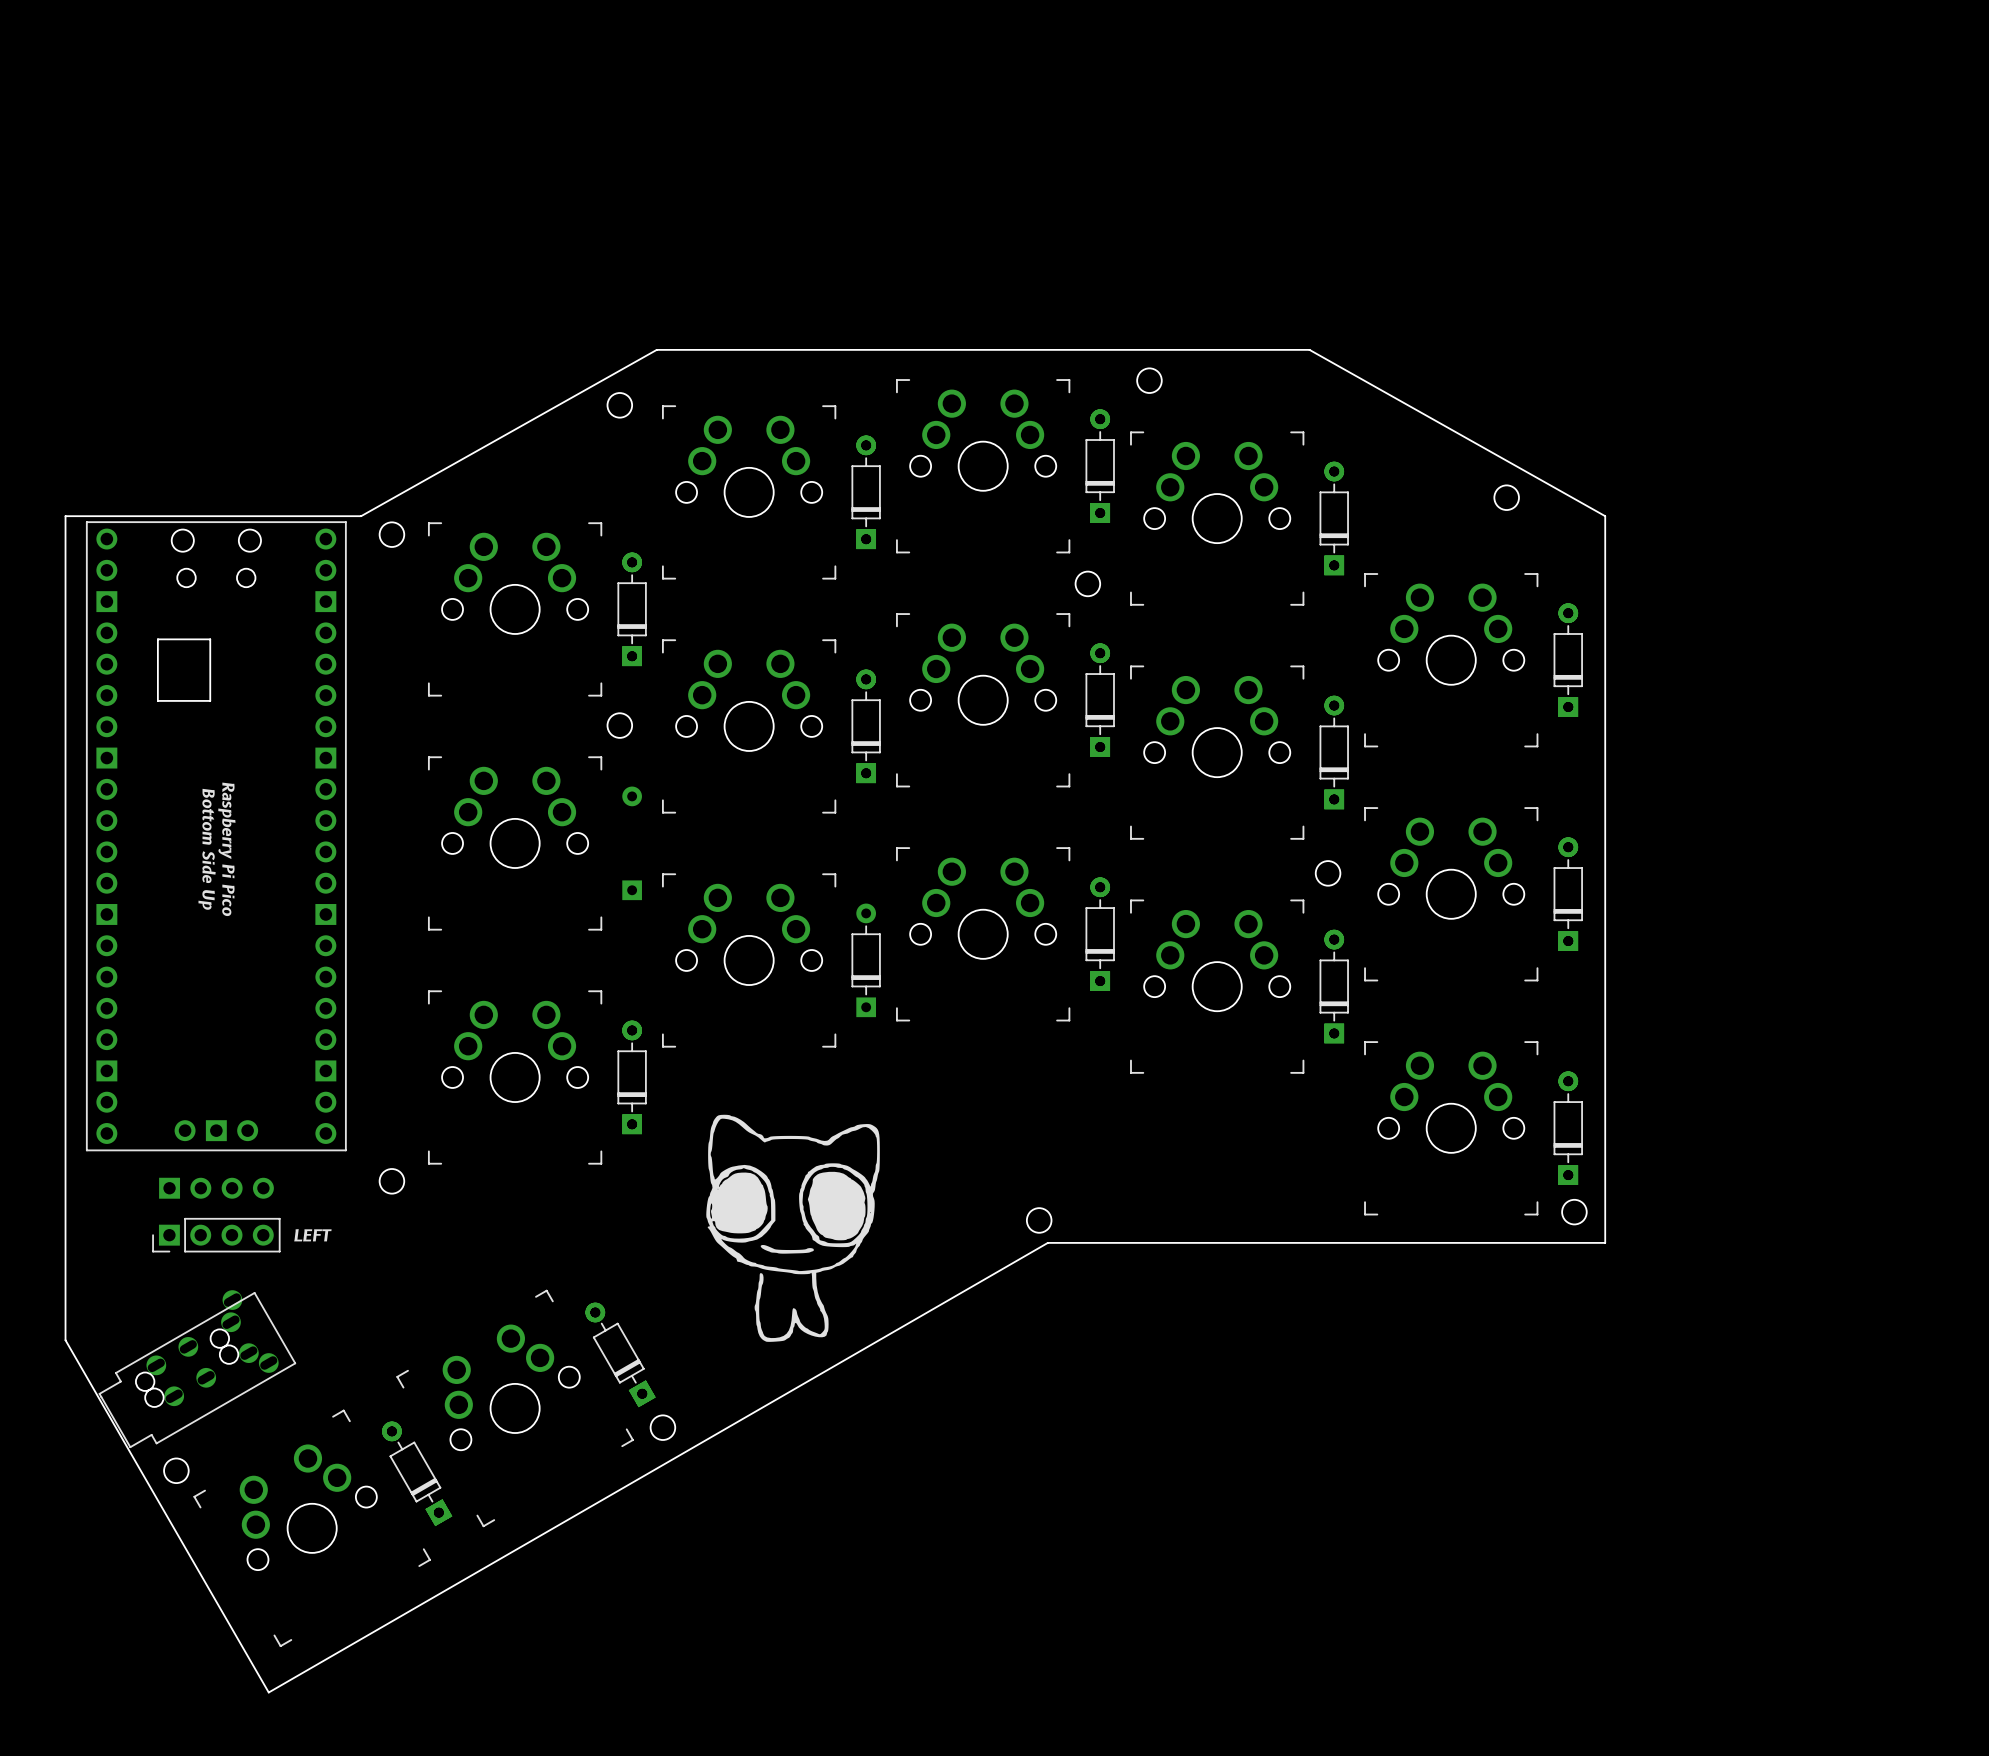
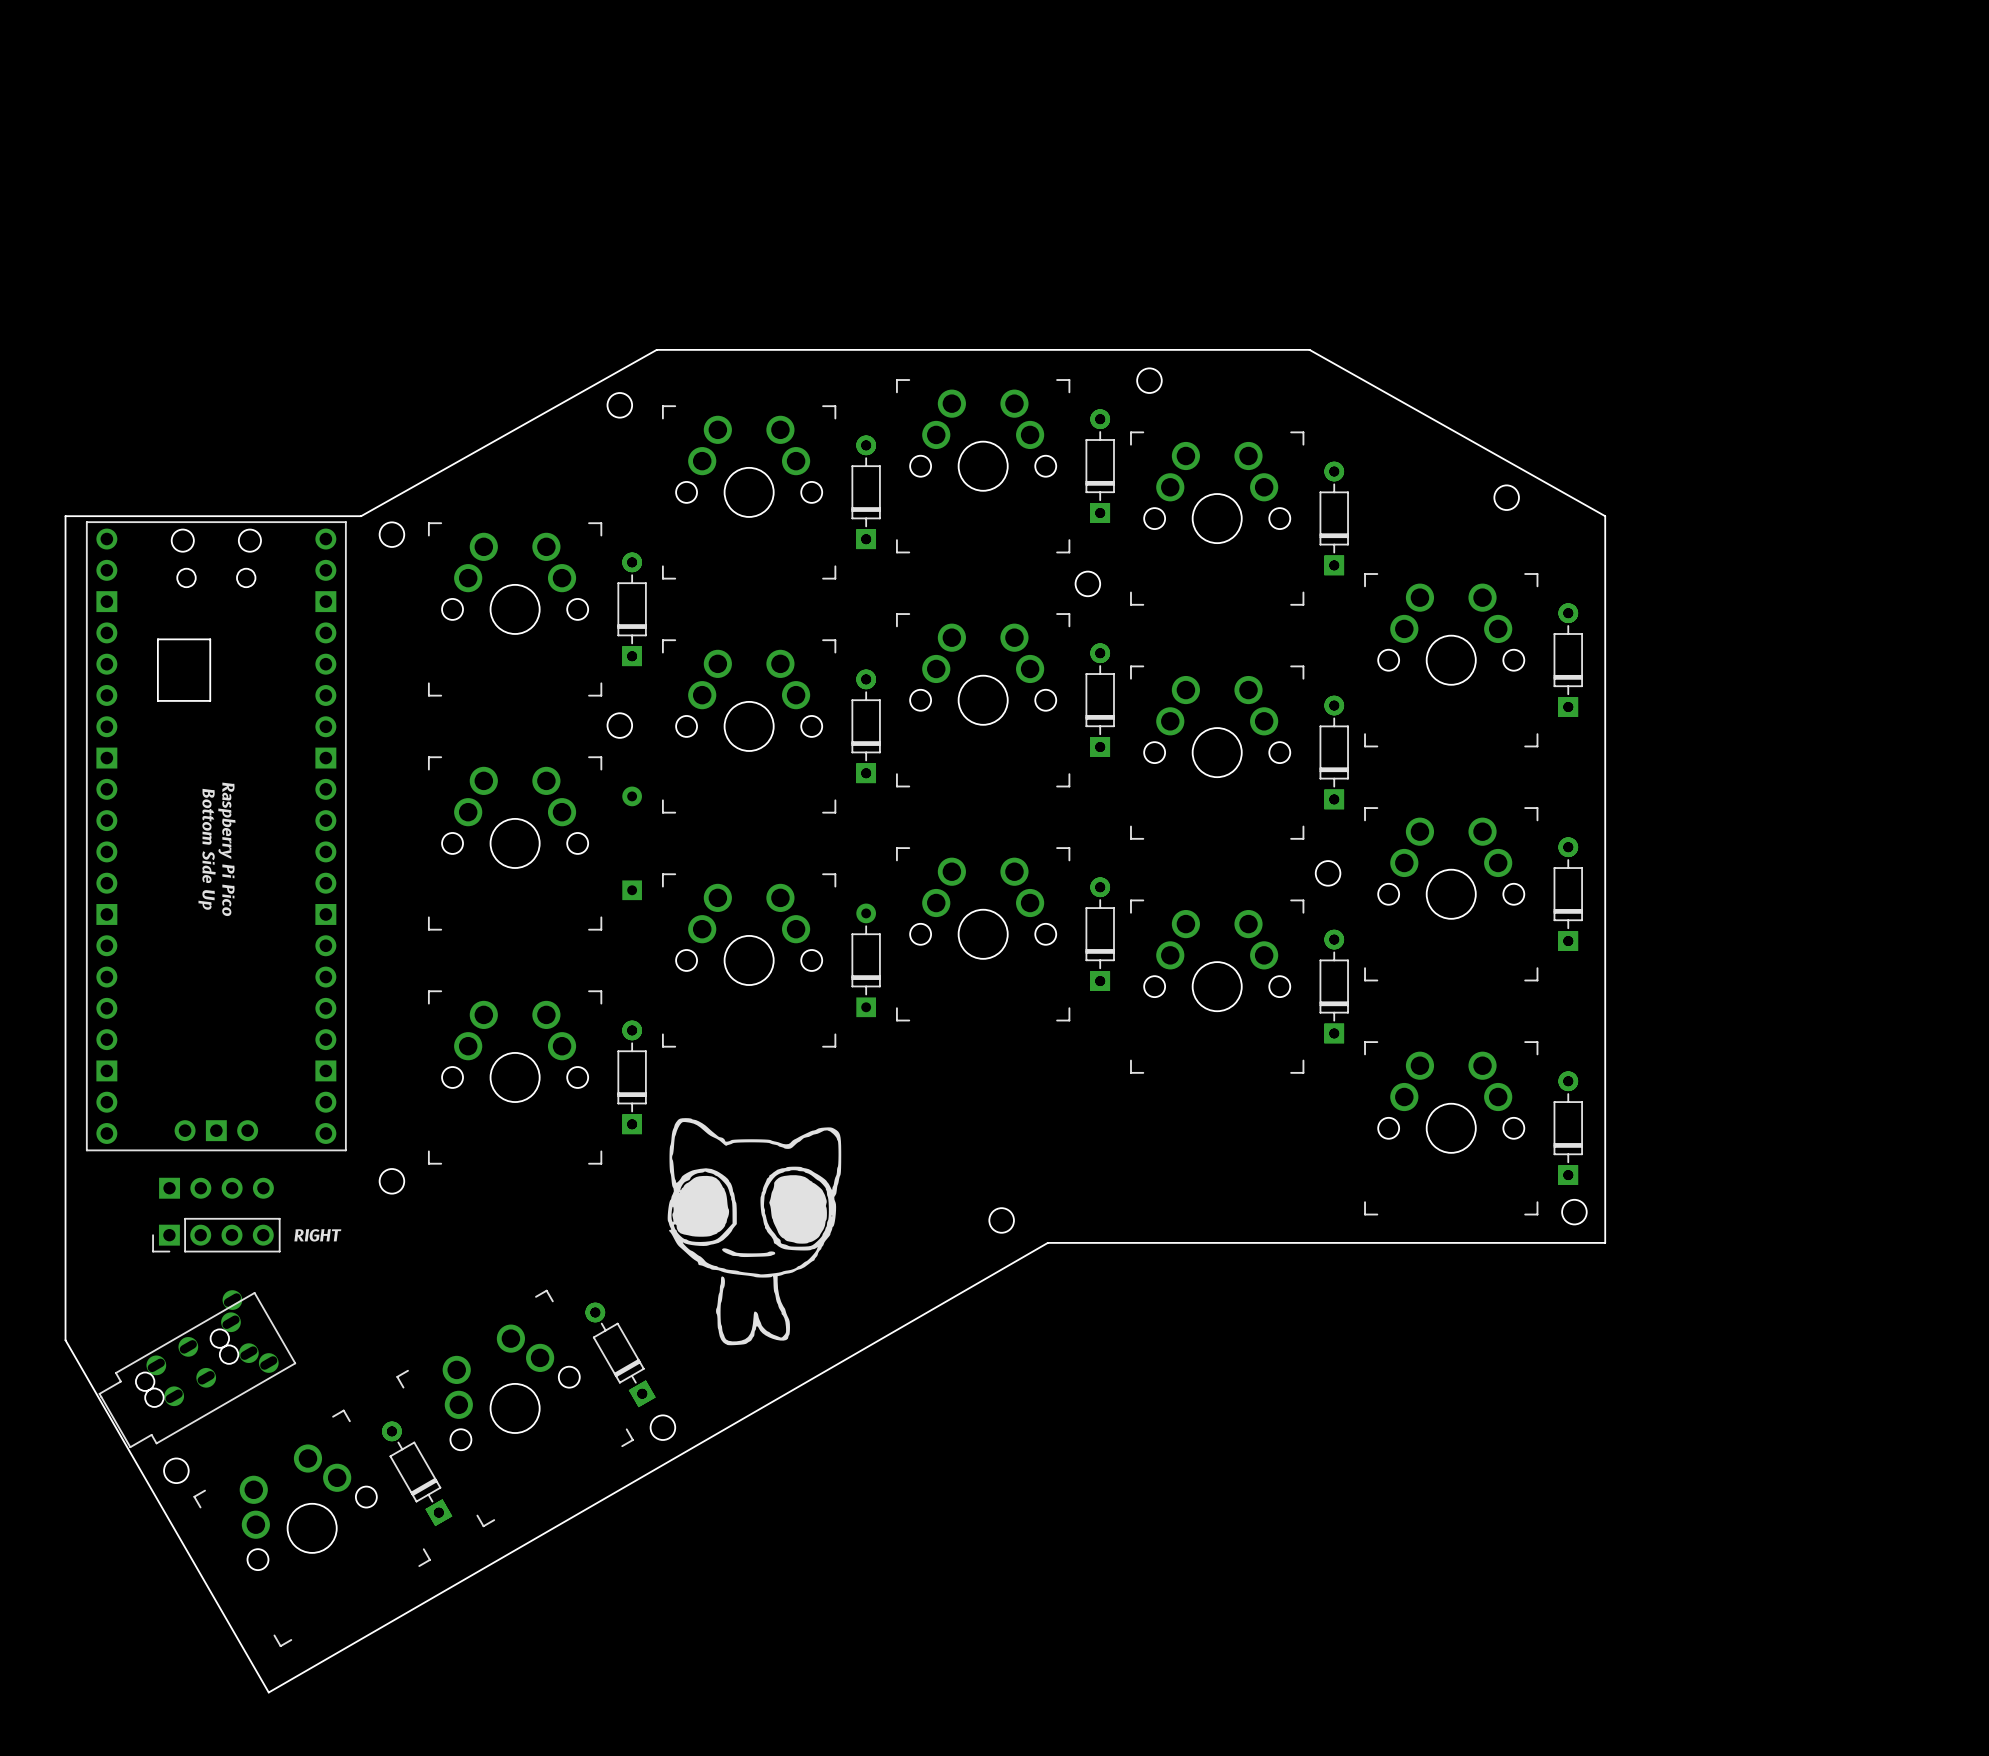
round board edge position: (1039, 1220) -> (1001, 1220)
drawing position: (793, 1228) -> (754, 1231)
text: LEFT (312, 1235) -> RIGHT (317, 1235)

